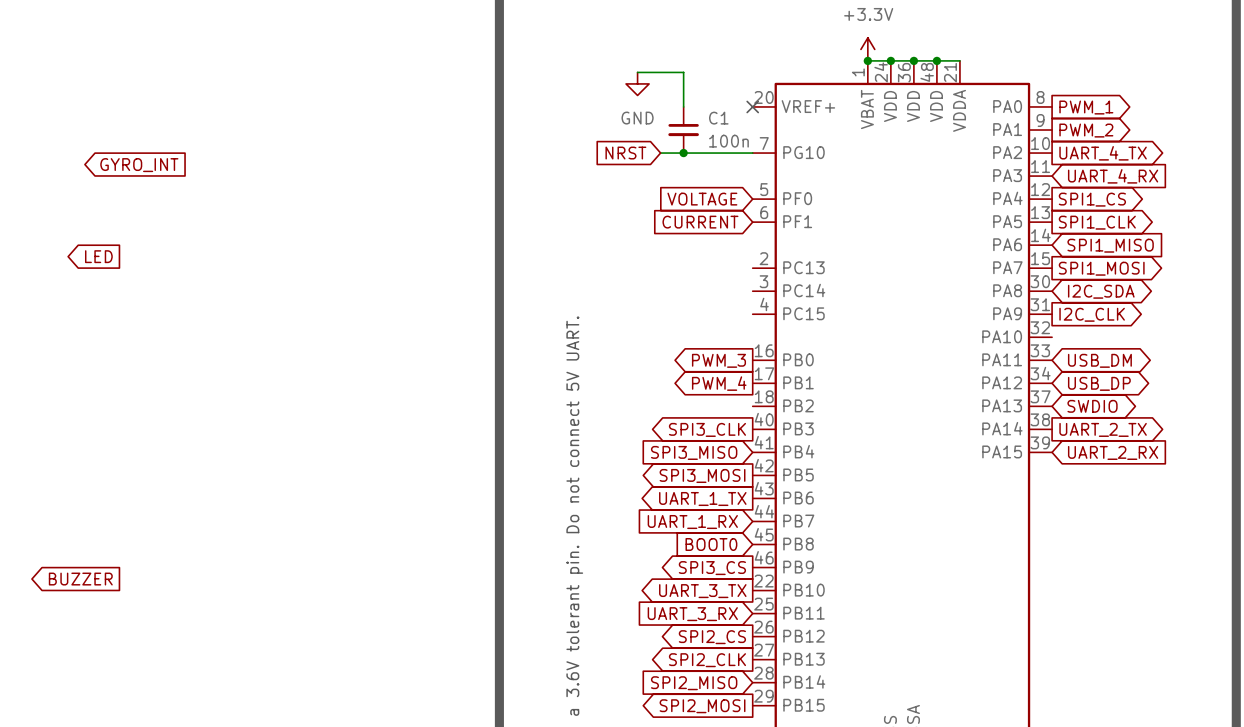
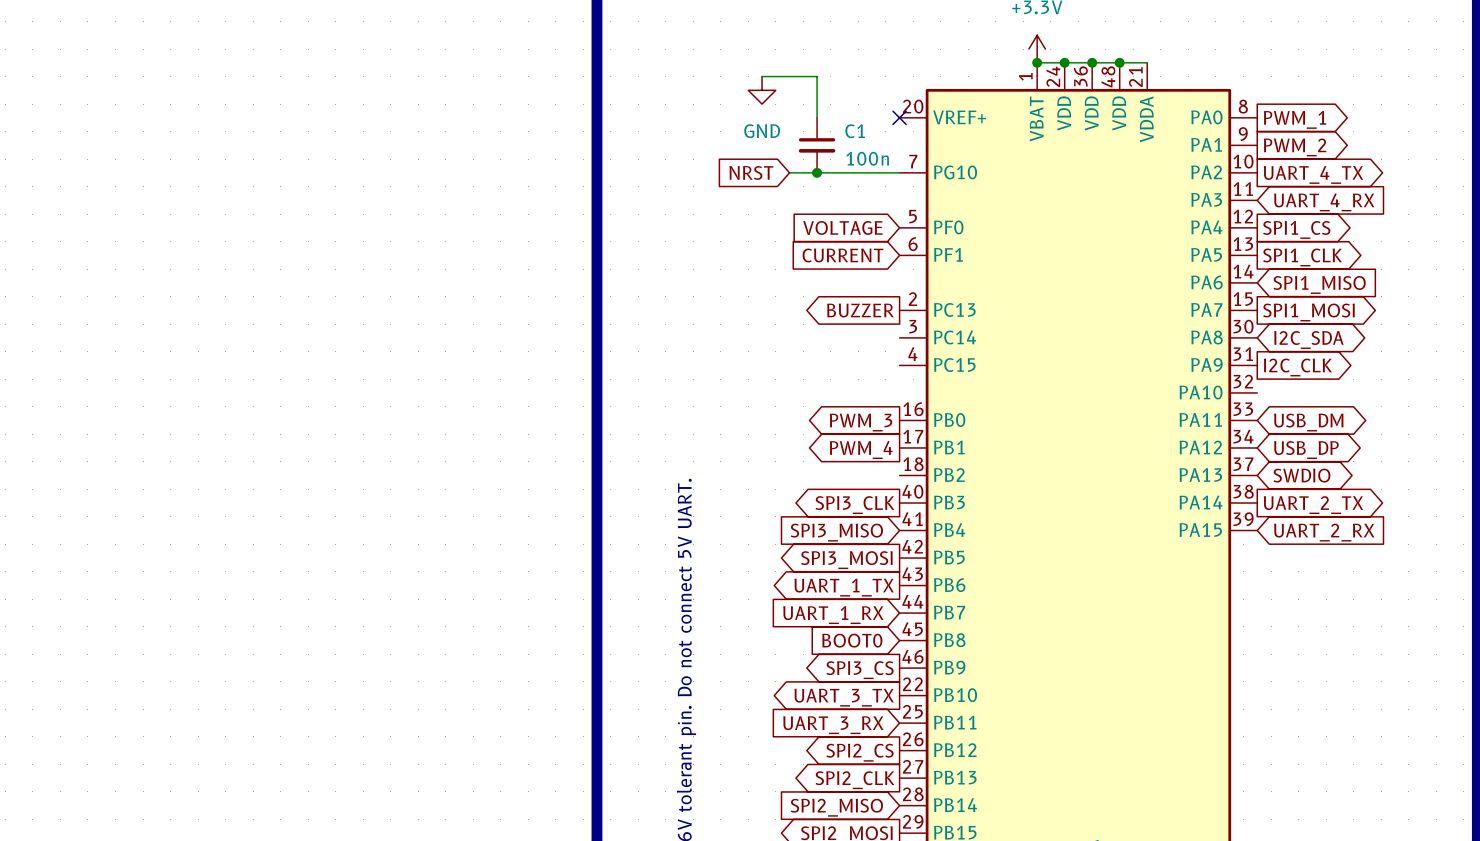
global label: GYRO_INT (139, 165) -> none
global label: LED (98, 256) -> none
global label: none -> BUZZER (860, 310)
global label: BUZZER (80, 579) -> none

